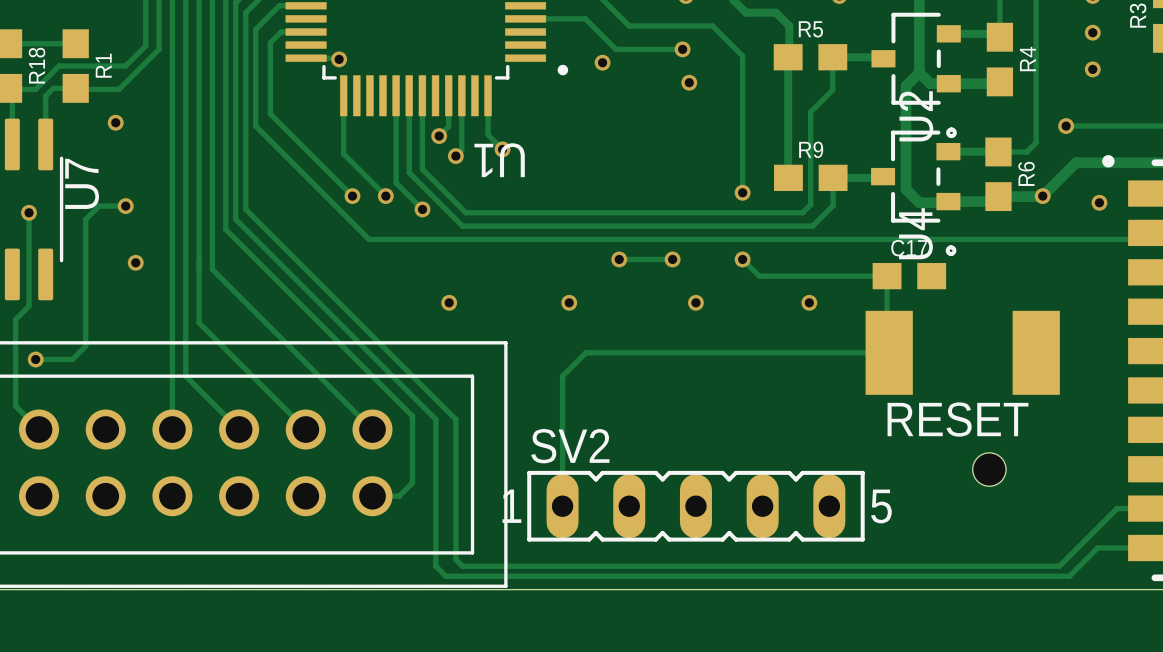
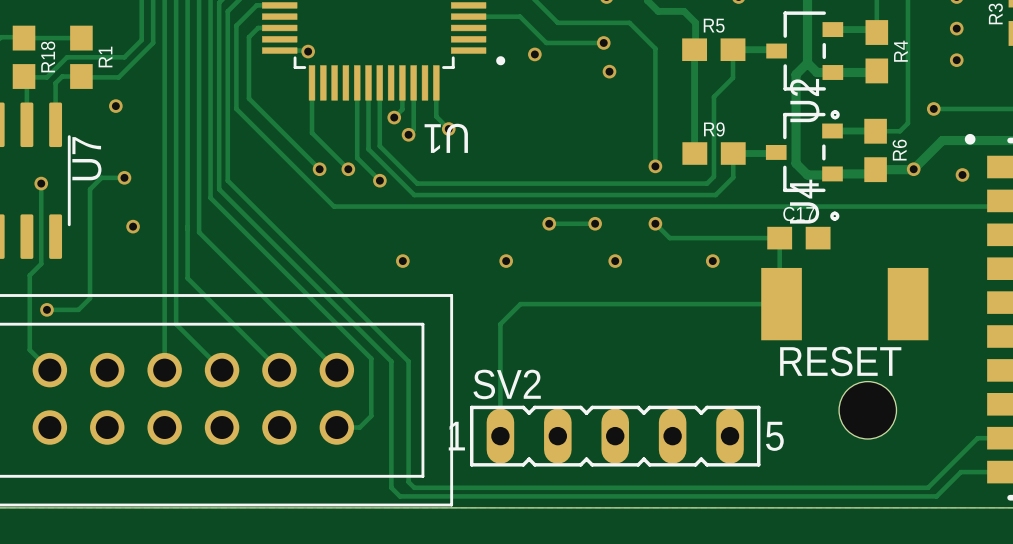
hole size: [972, 452, 1007, 487] -> [839, 381, 897, 440]

